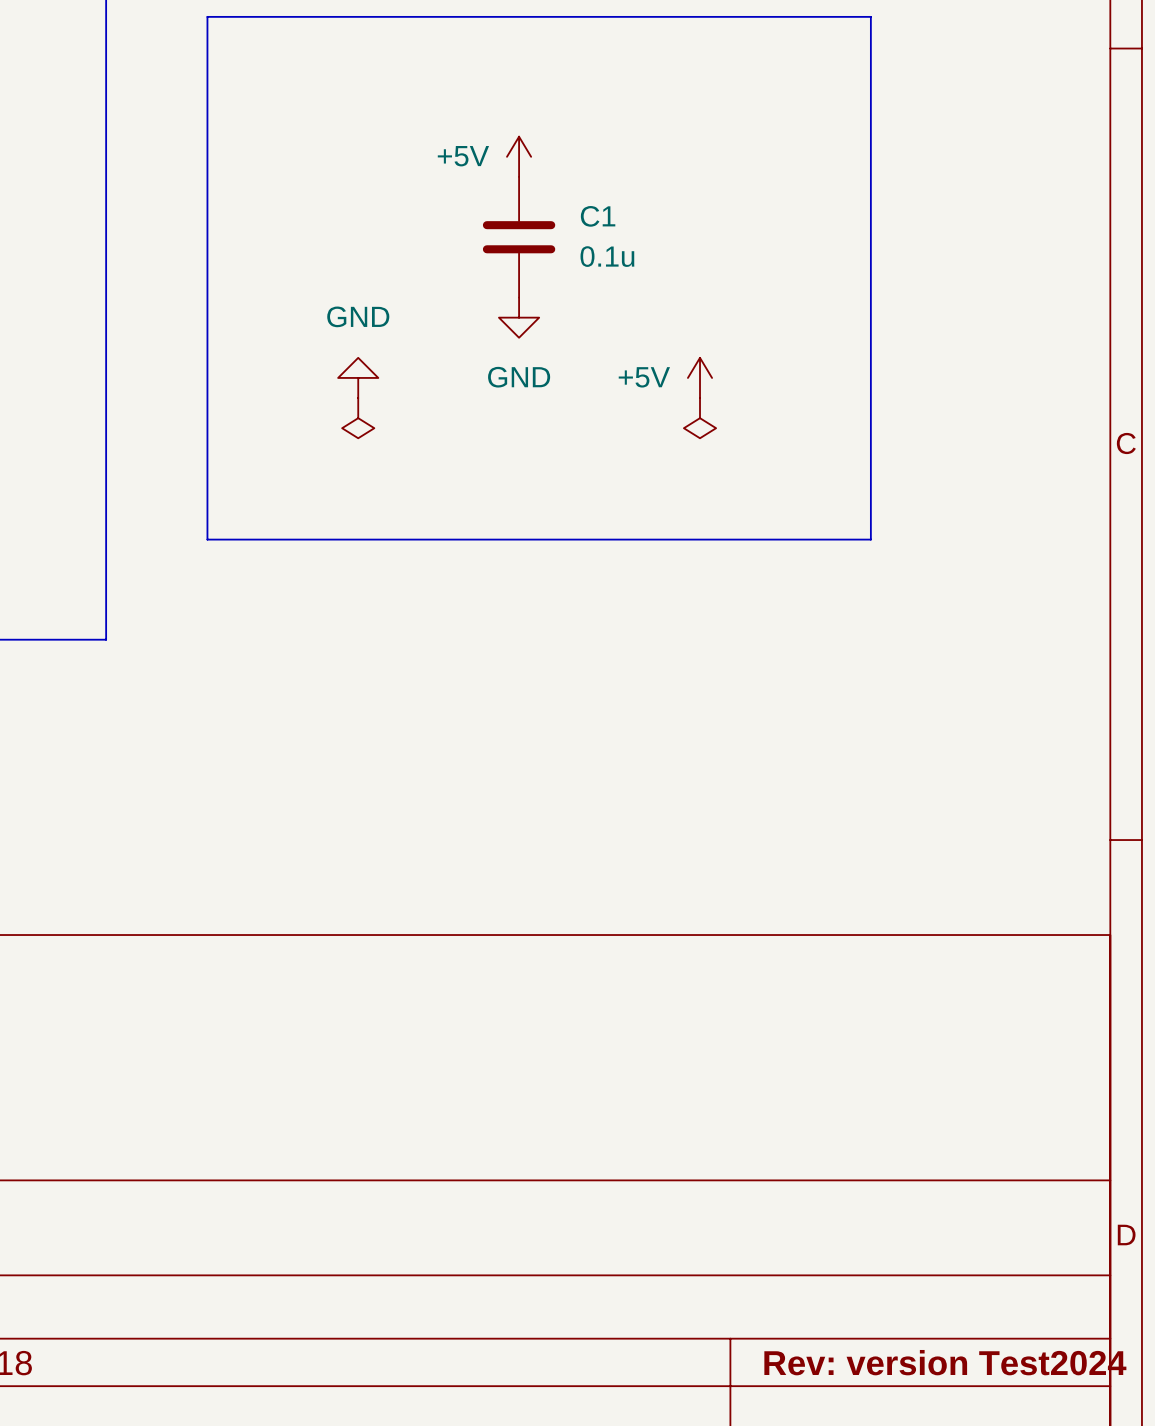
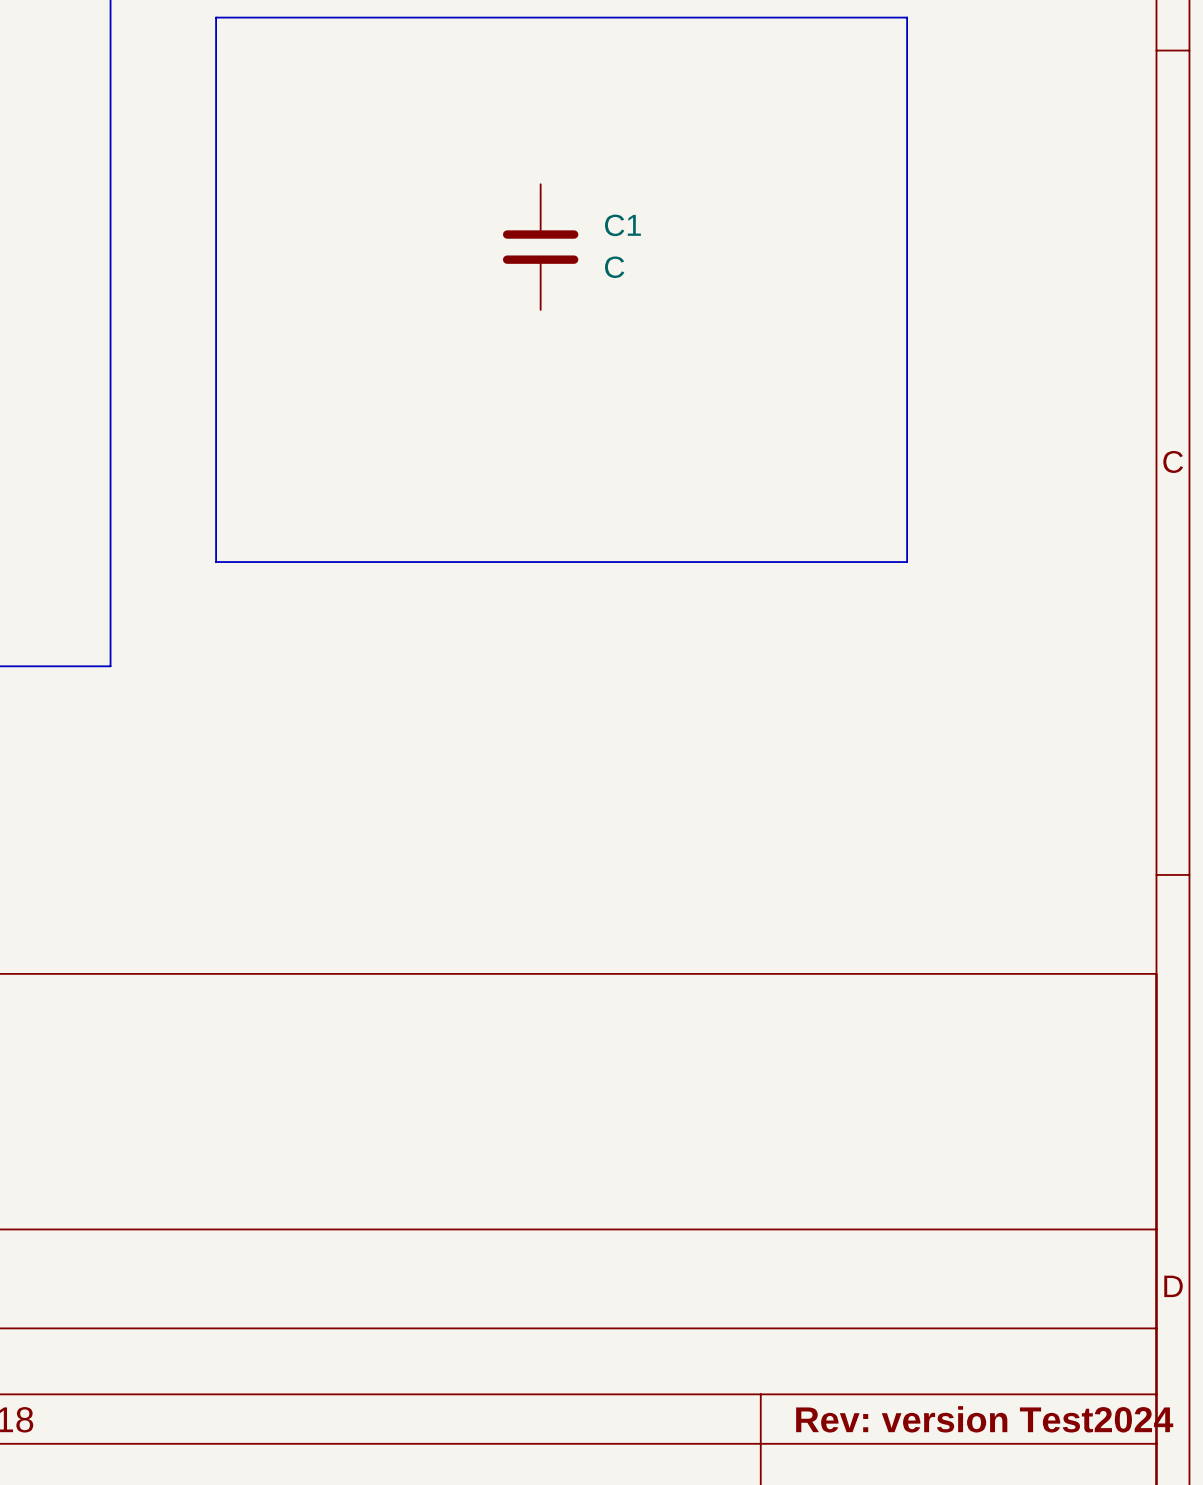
power symbol: +5V (519, 156) -> none
C1 value: 0.1u (607, 256) -> C (614, 267)
power symbol: GND (519, 317) -> none
power symbol: GND (358, 377) -> none
power symbol: +5V (700, 377) -> none
power symbol: (358, 418) -> none
power symbol: (700, 418) -> none

